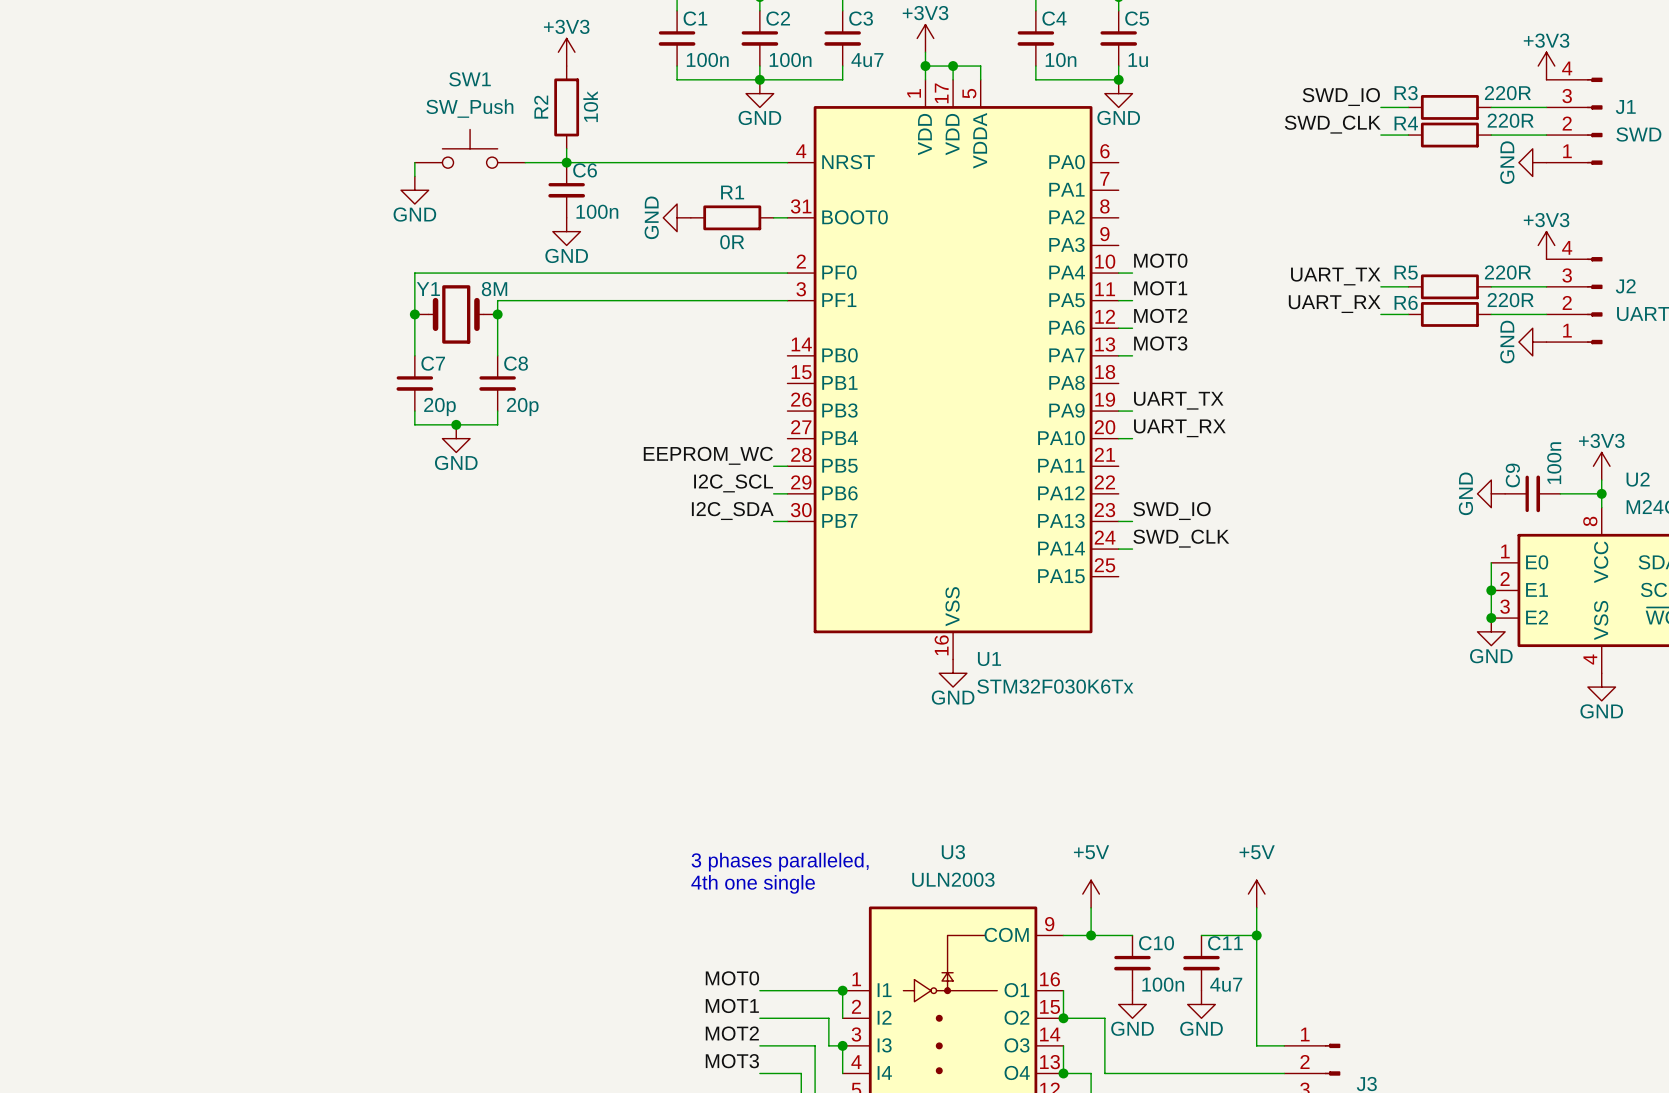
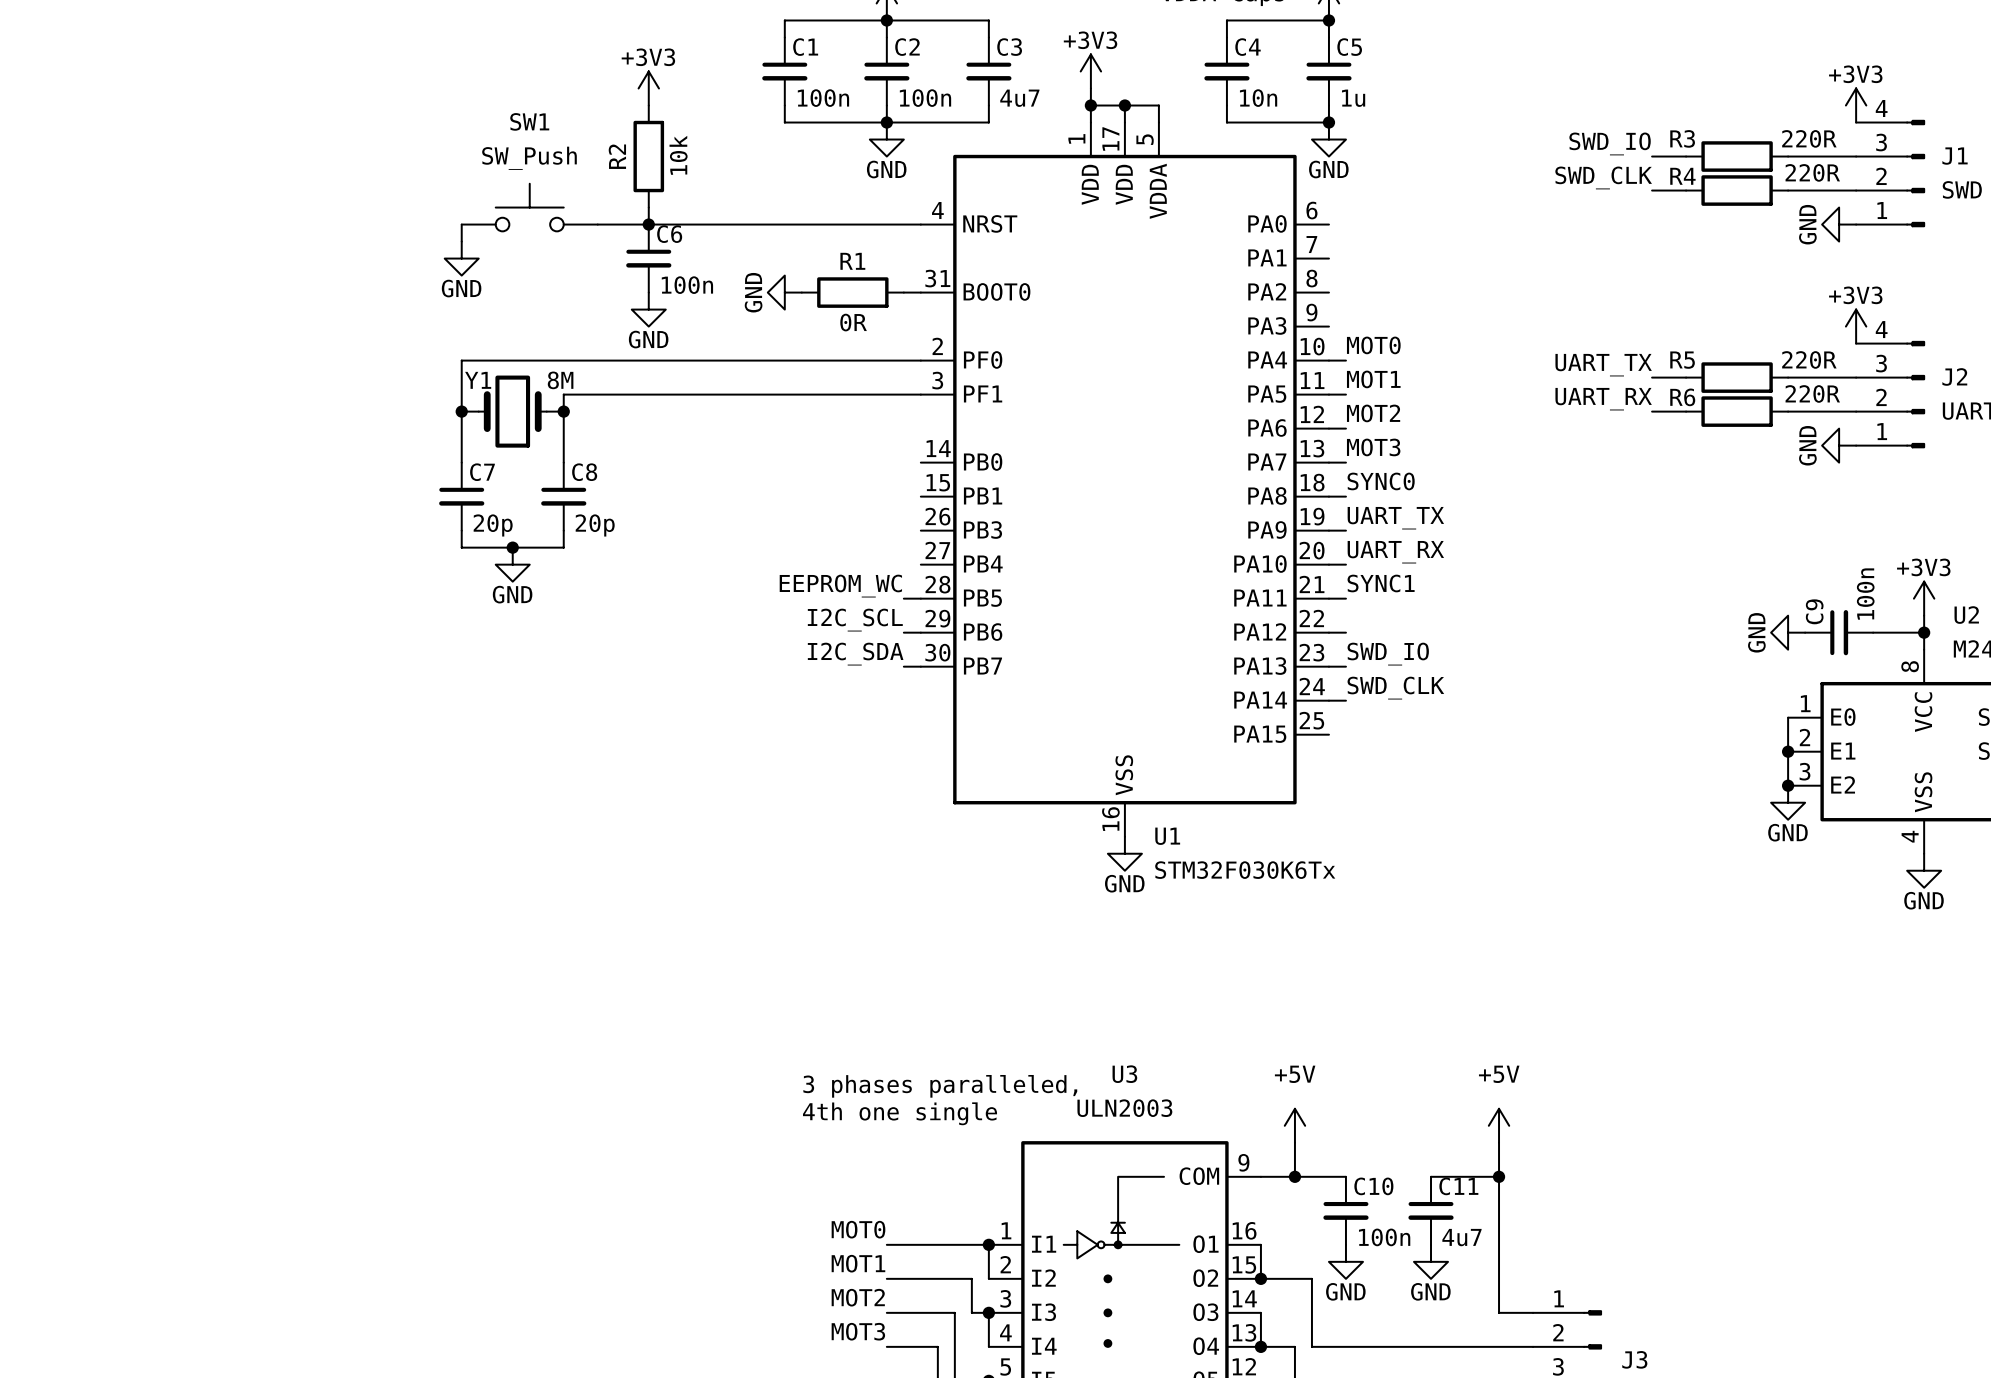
label: none -> SYNC0 (1381, 481)
wire: none -> (1328, 496) (1345, 496)
label: none -> SYNC1 (1381, 583)
wire: none -> (1328, 598) (1345, 598)
wire: none -> (1328, 632) (1345, 632)

